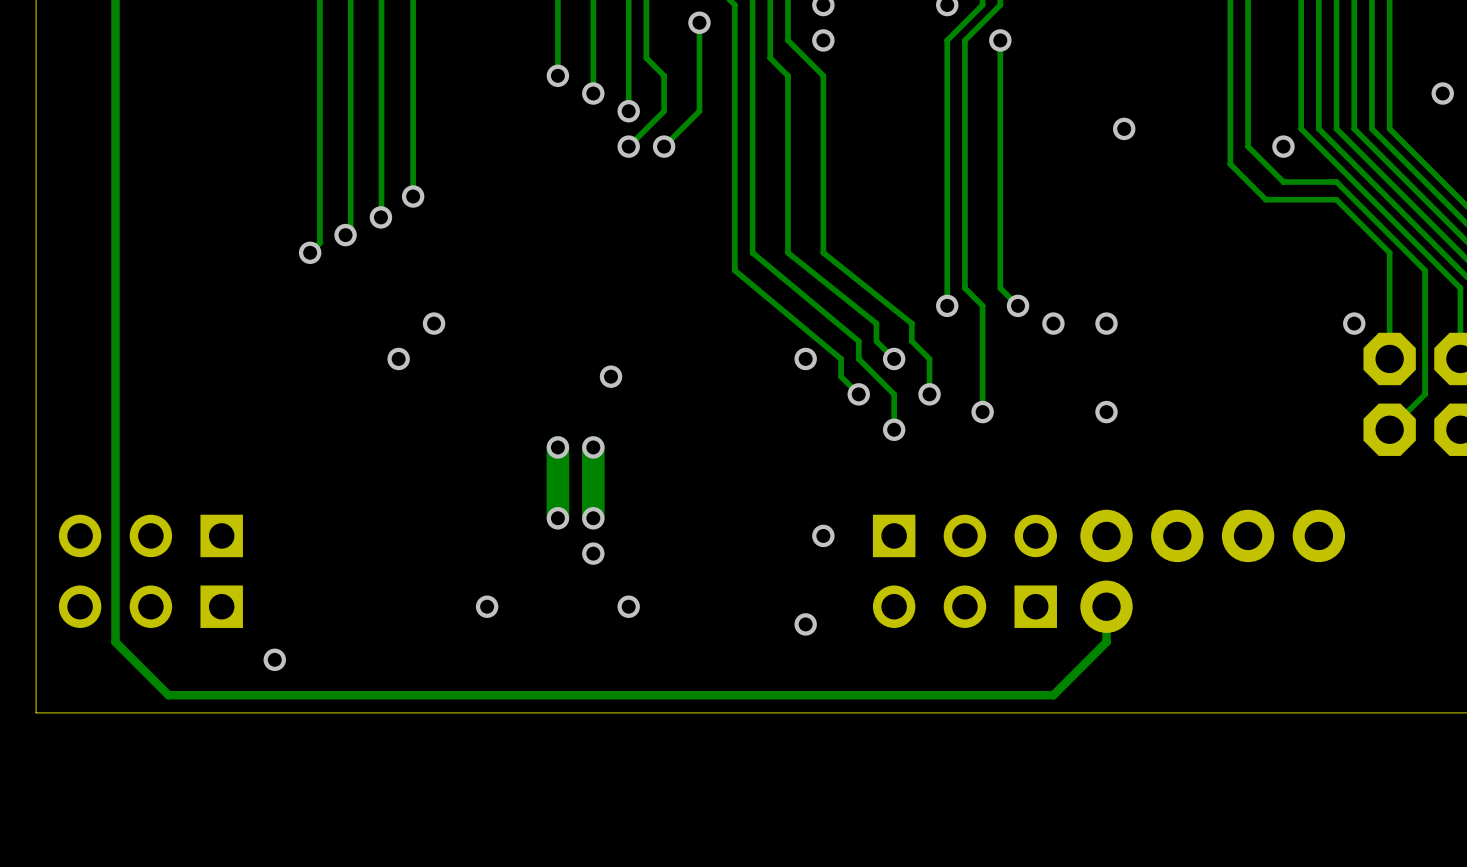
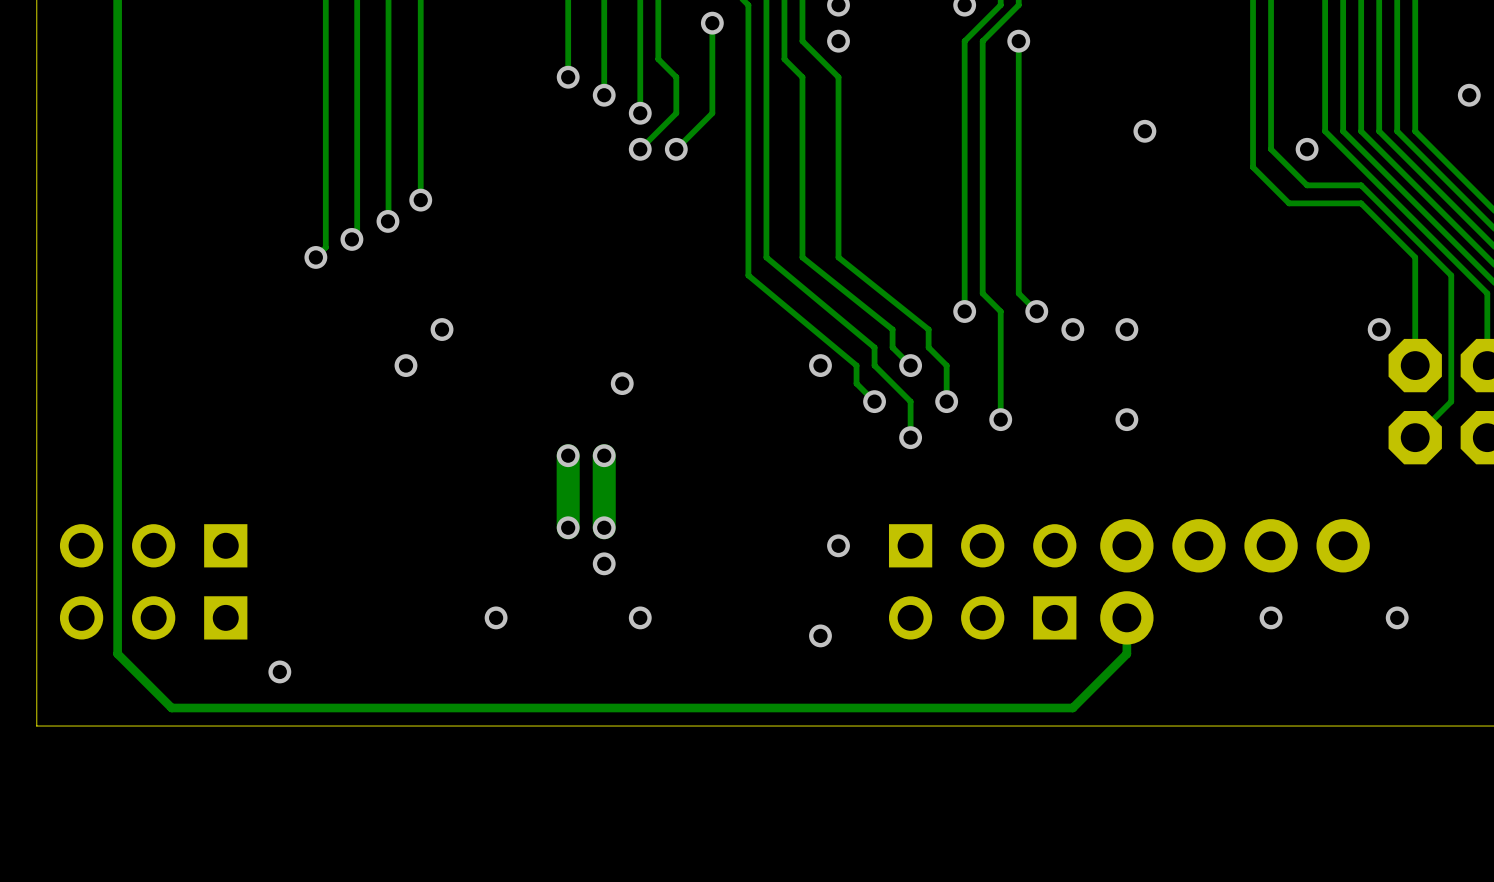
via: none -> (1271, 617)
via: none -> (1397, 617)

